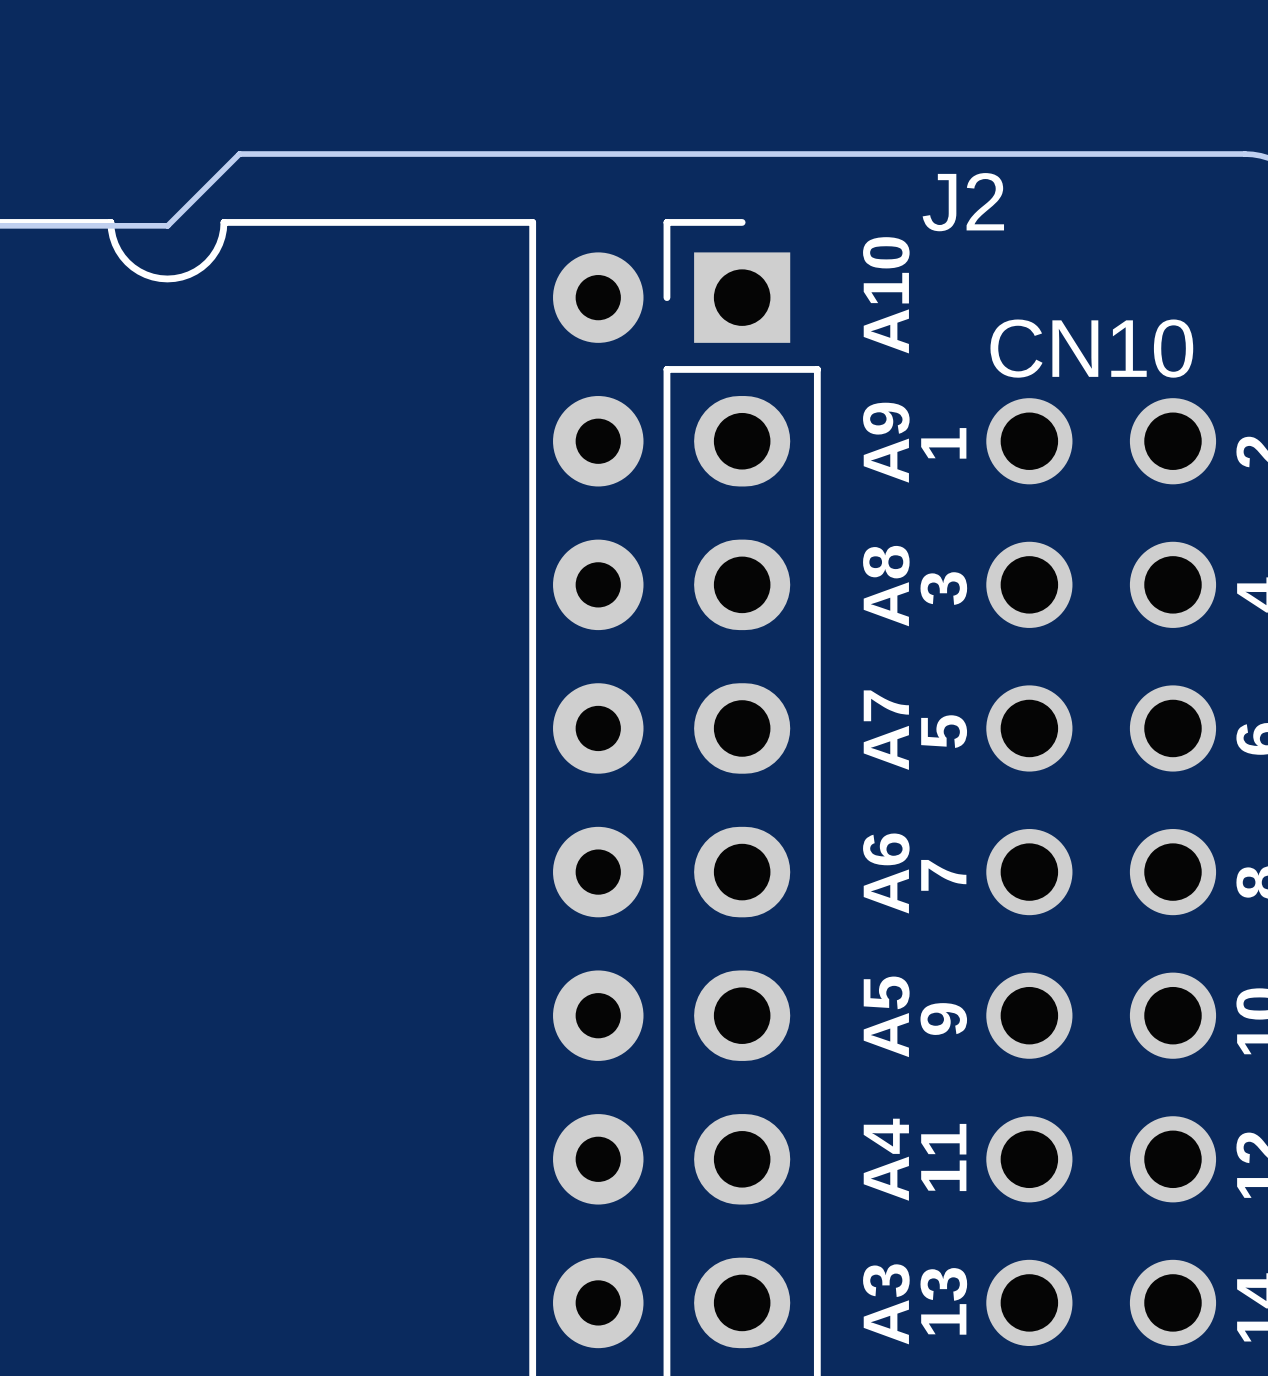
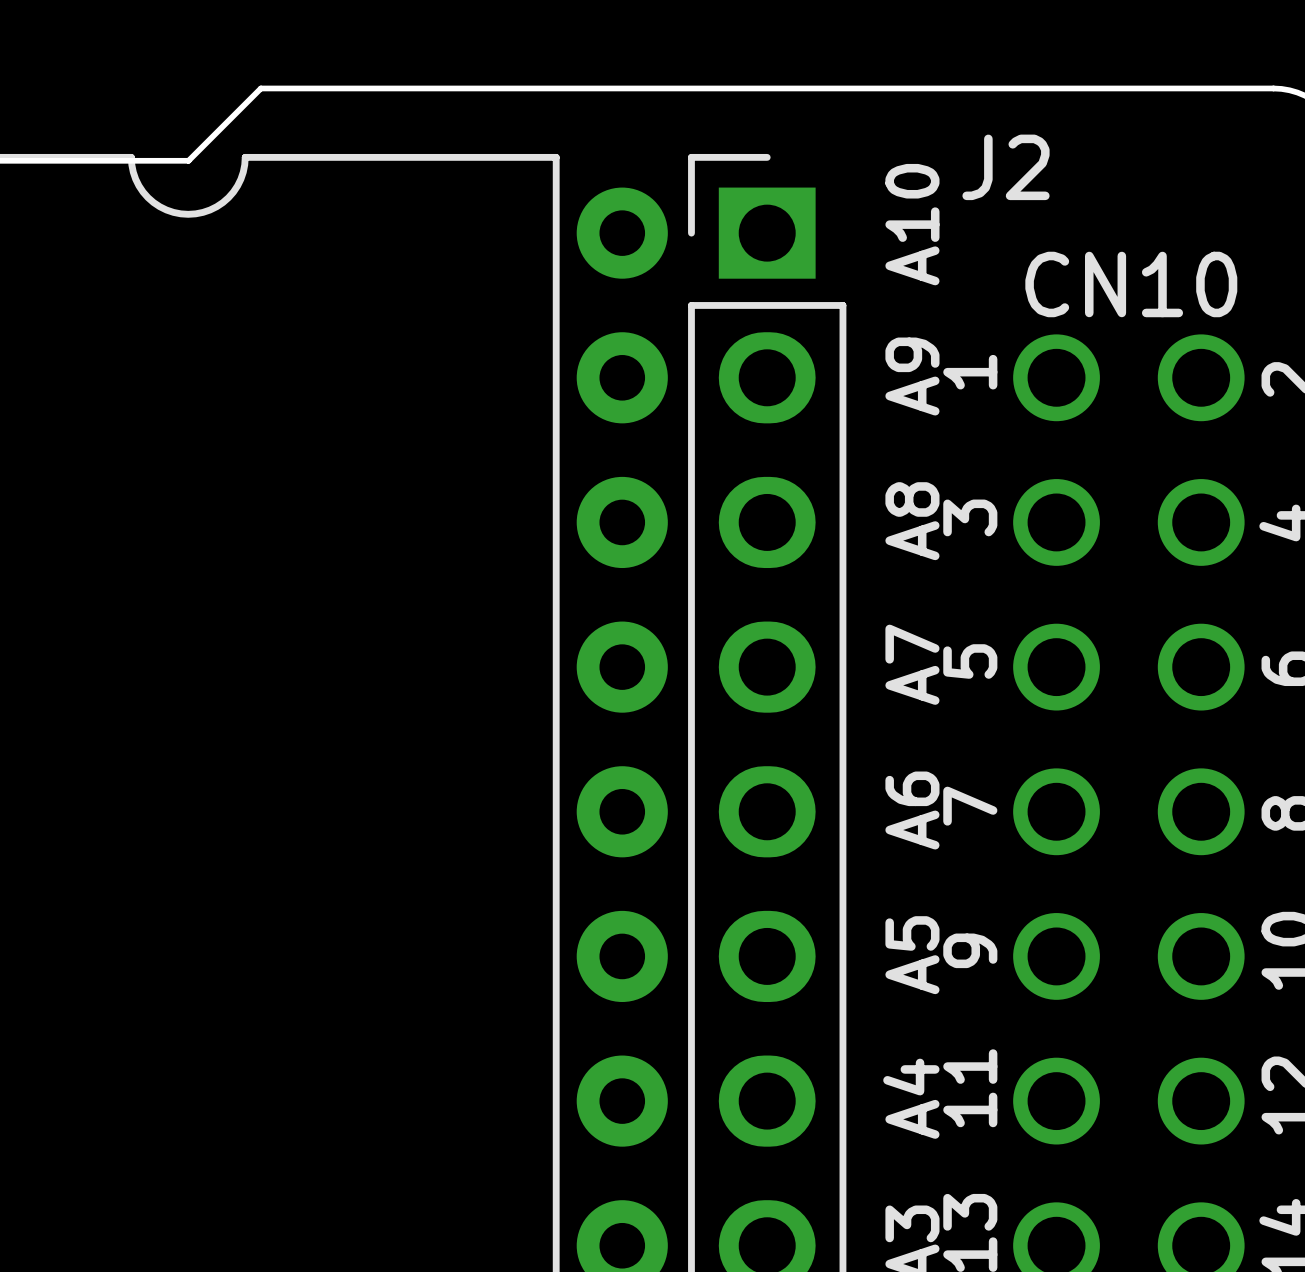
J2 name position: J2 (963, 202) -> J2 (1006, 167)

